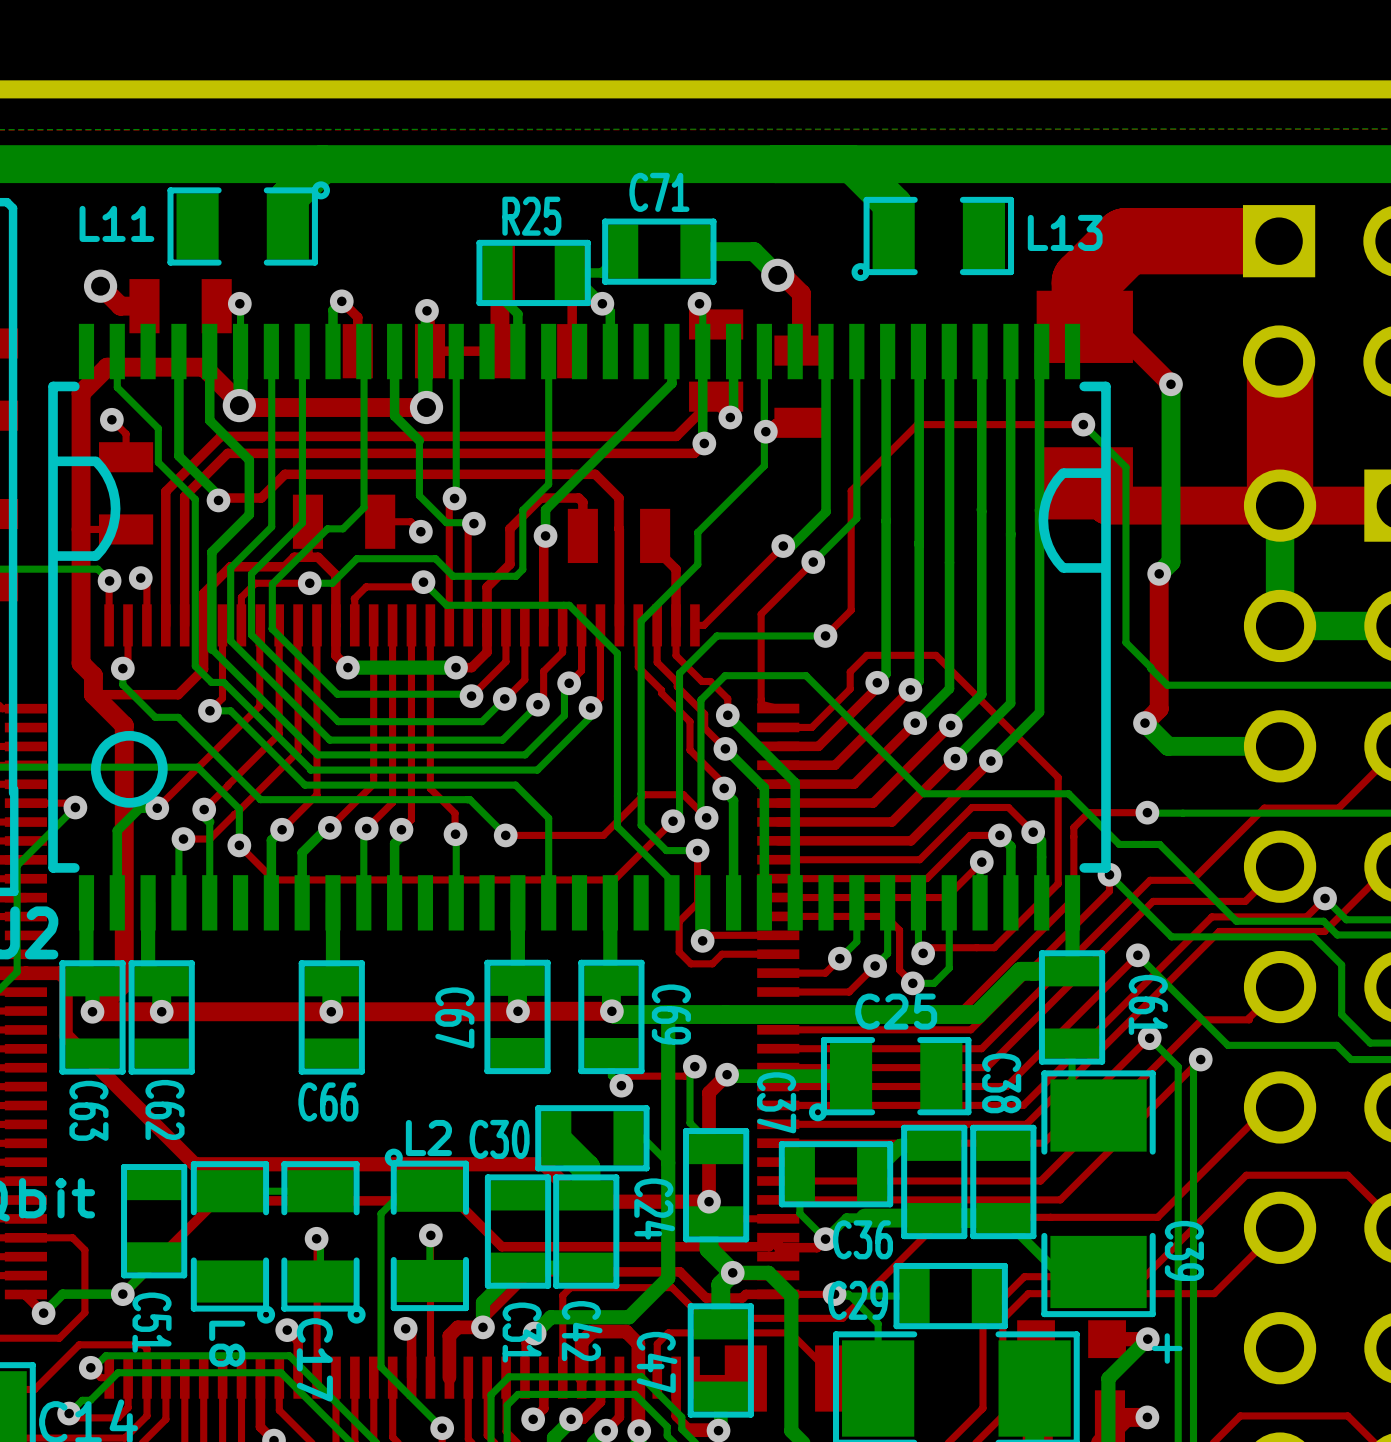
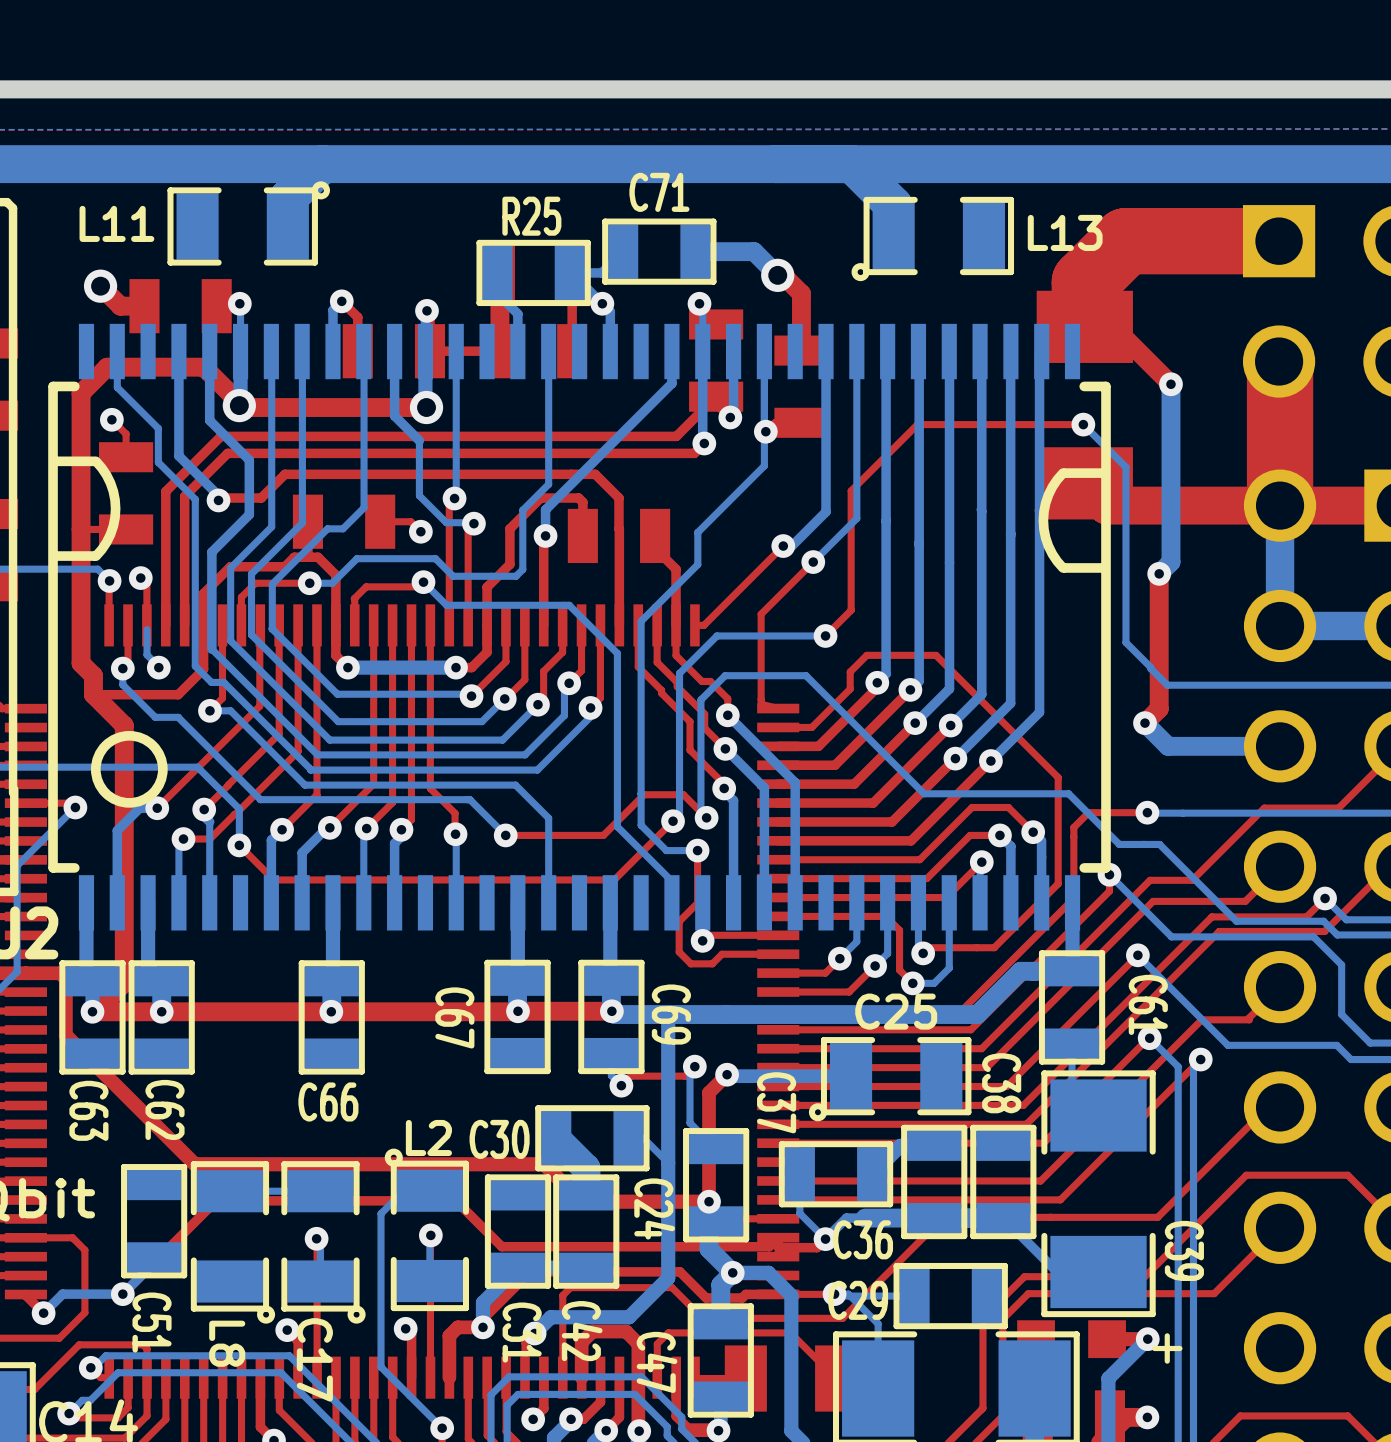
bottom track: none -> (147, 629) (147, 654) (158, 667)
via: none -> (158, 667)

